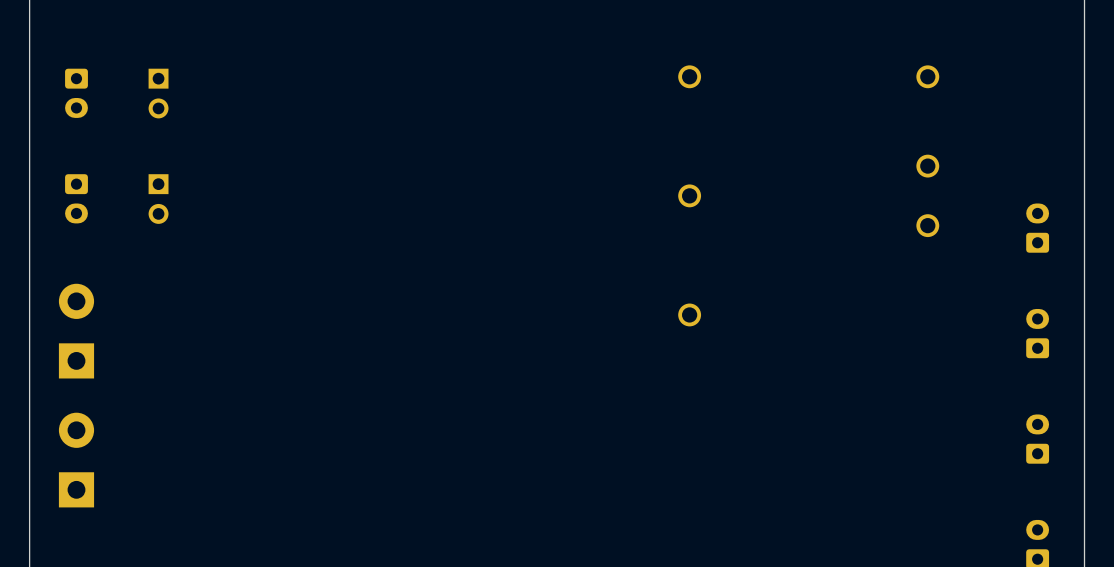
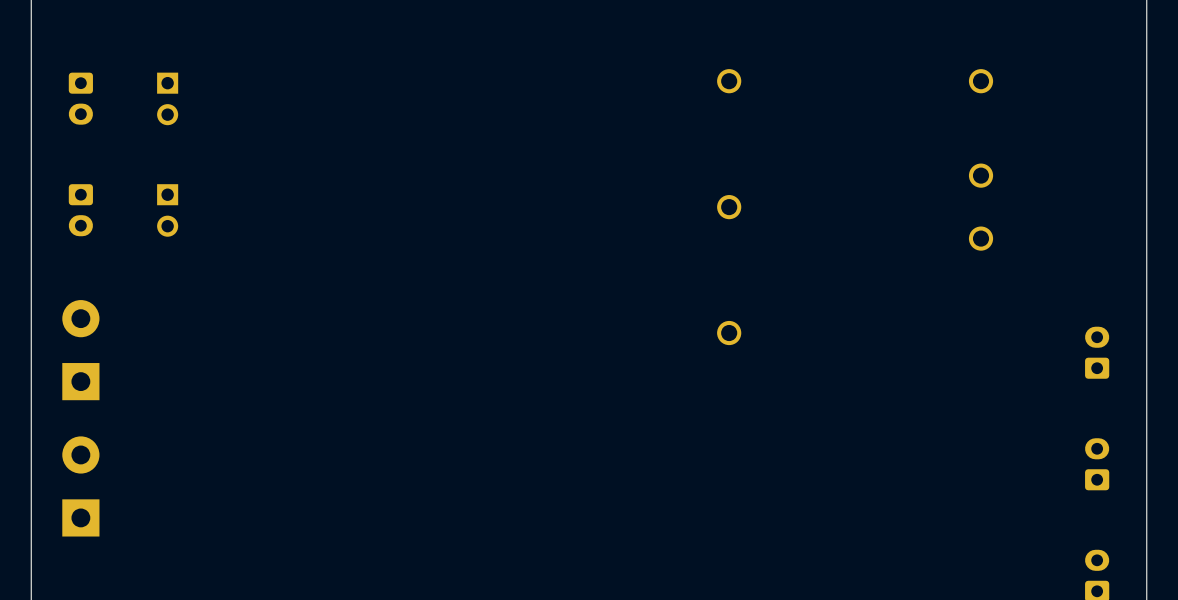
part: (1037, 228) -> none

